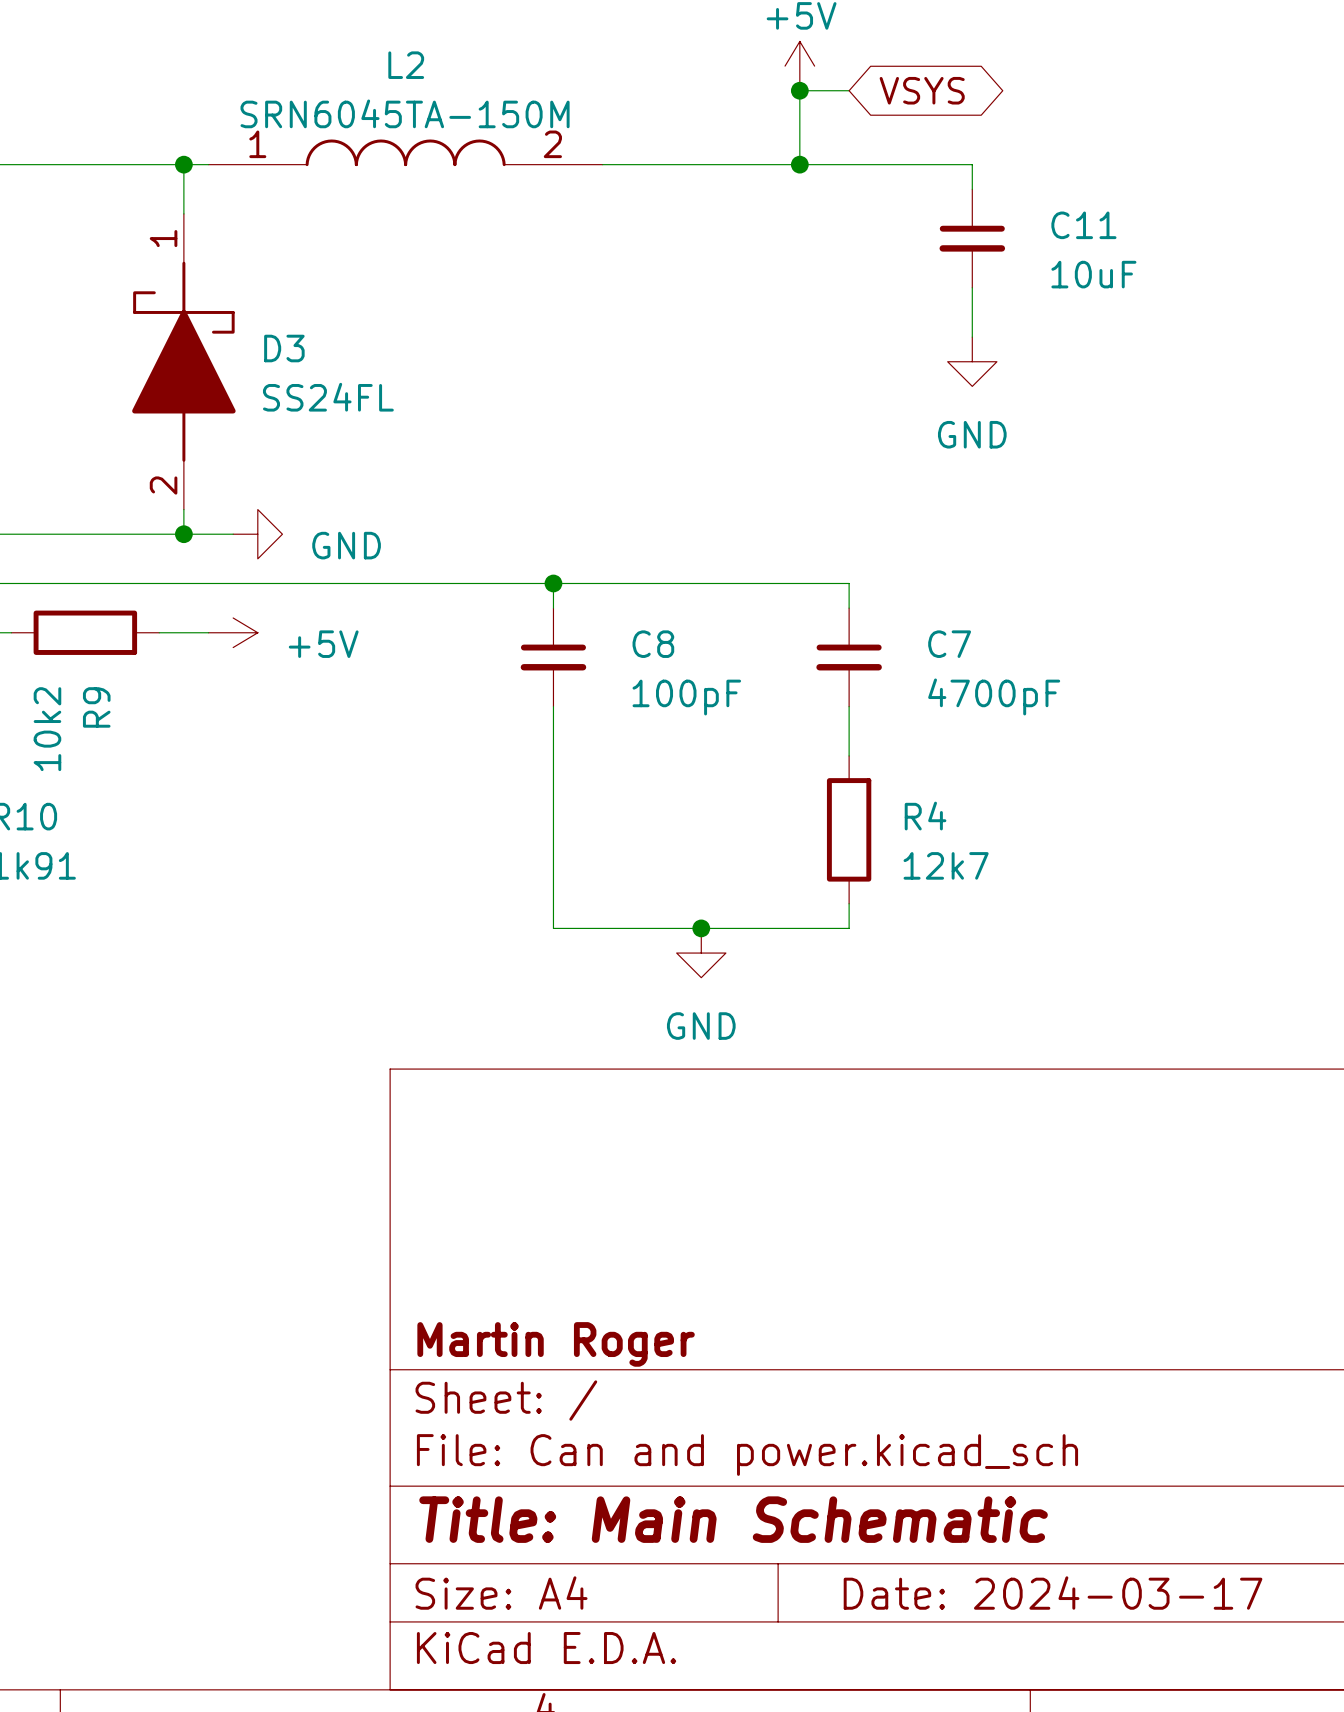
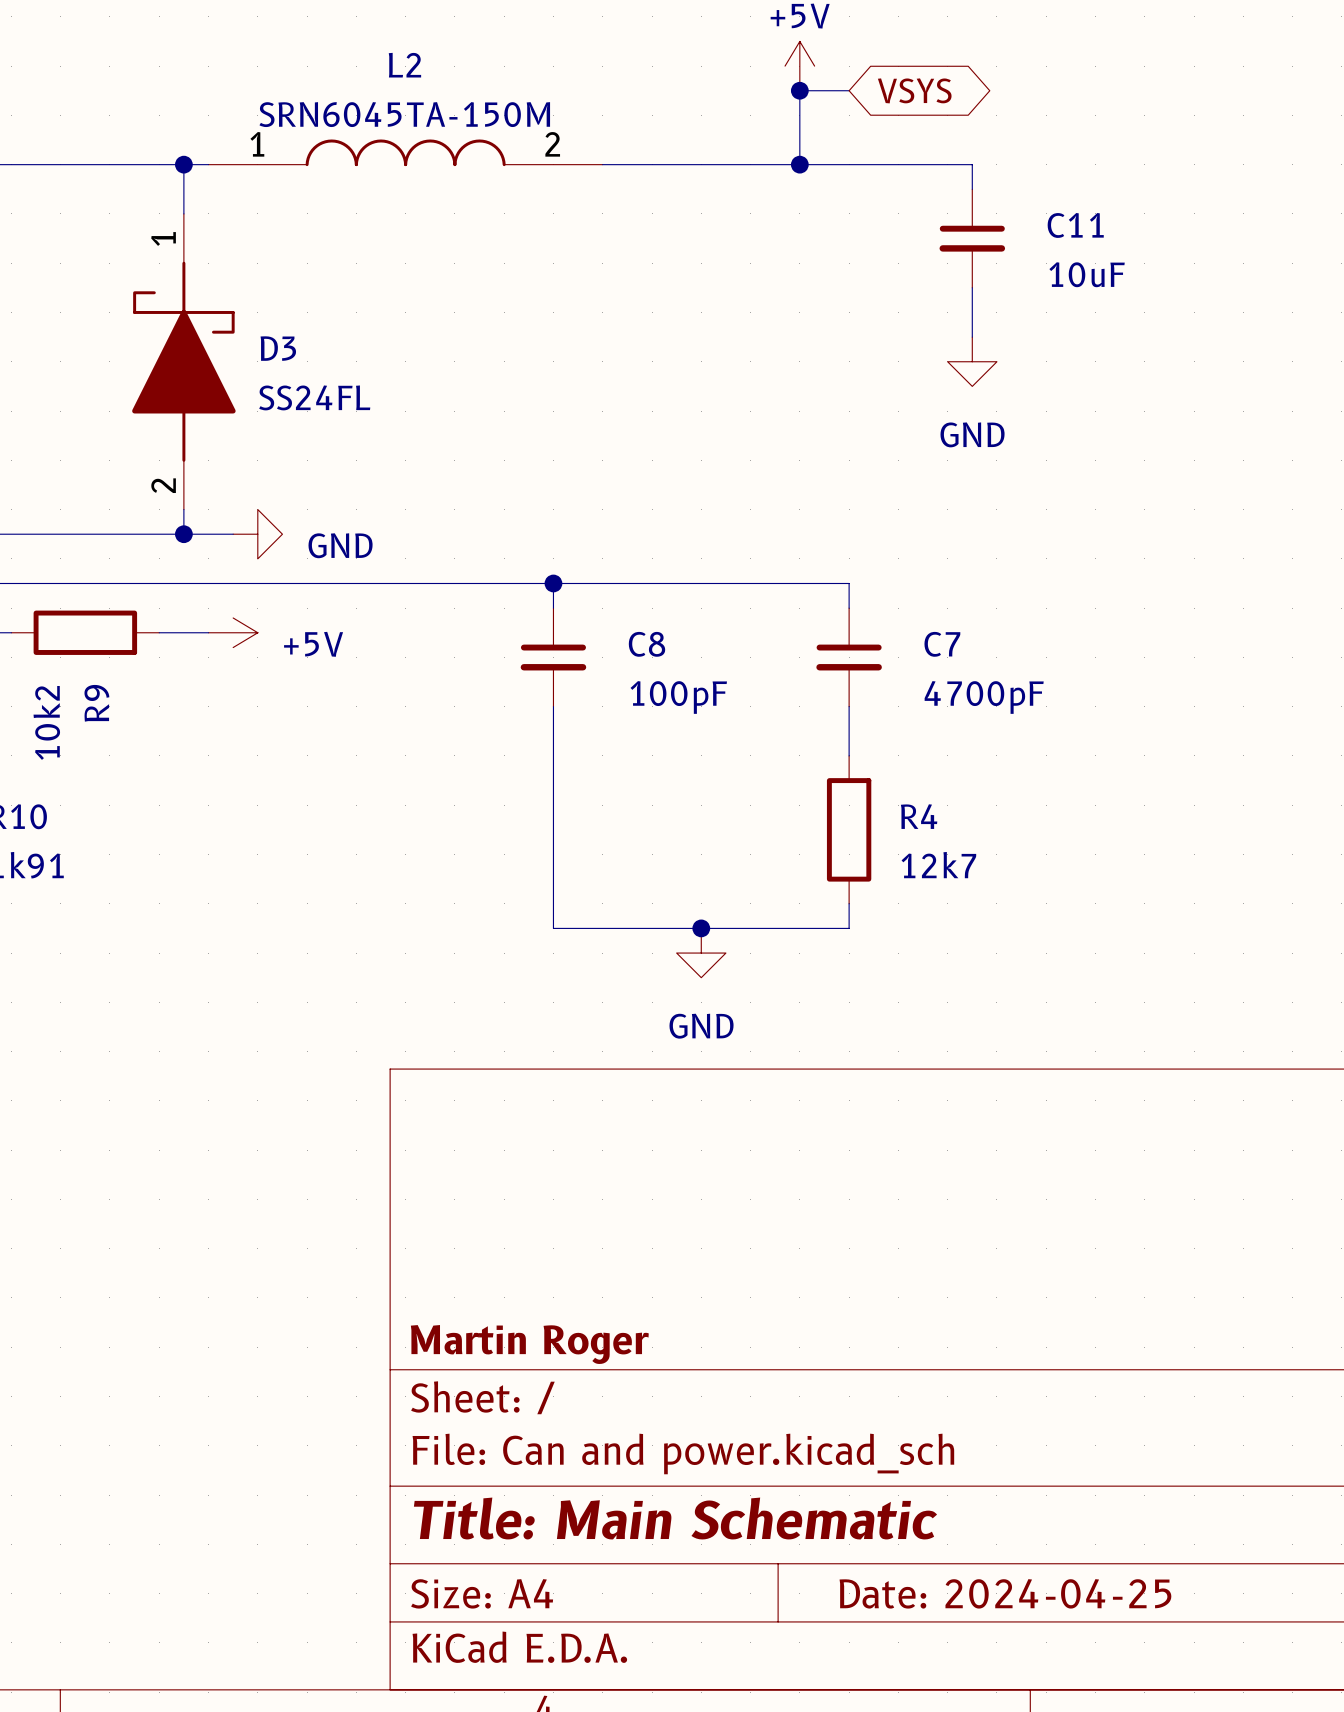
title block: Date: 2024-03-17 (1053, 1593) -> Date: 2024-04-25 (1005, 1593)

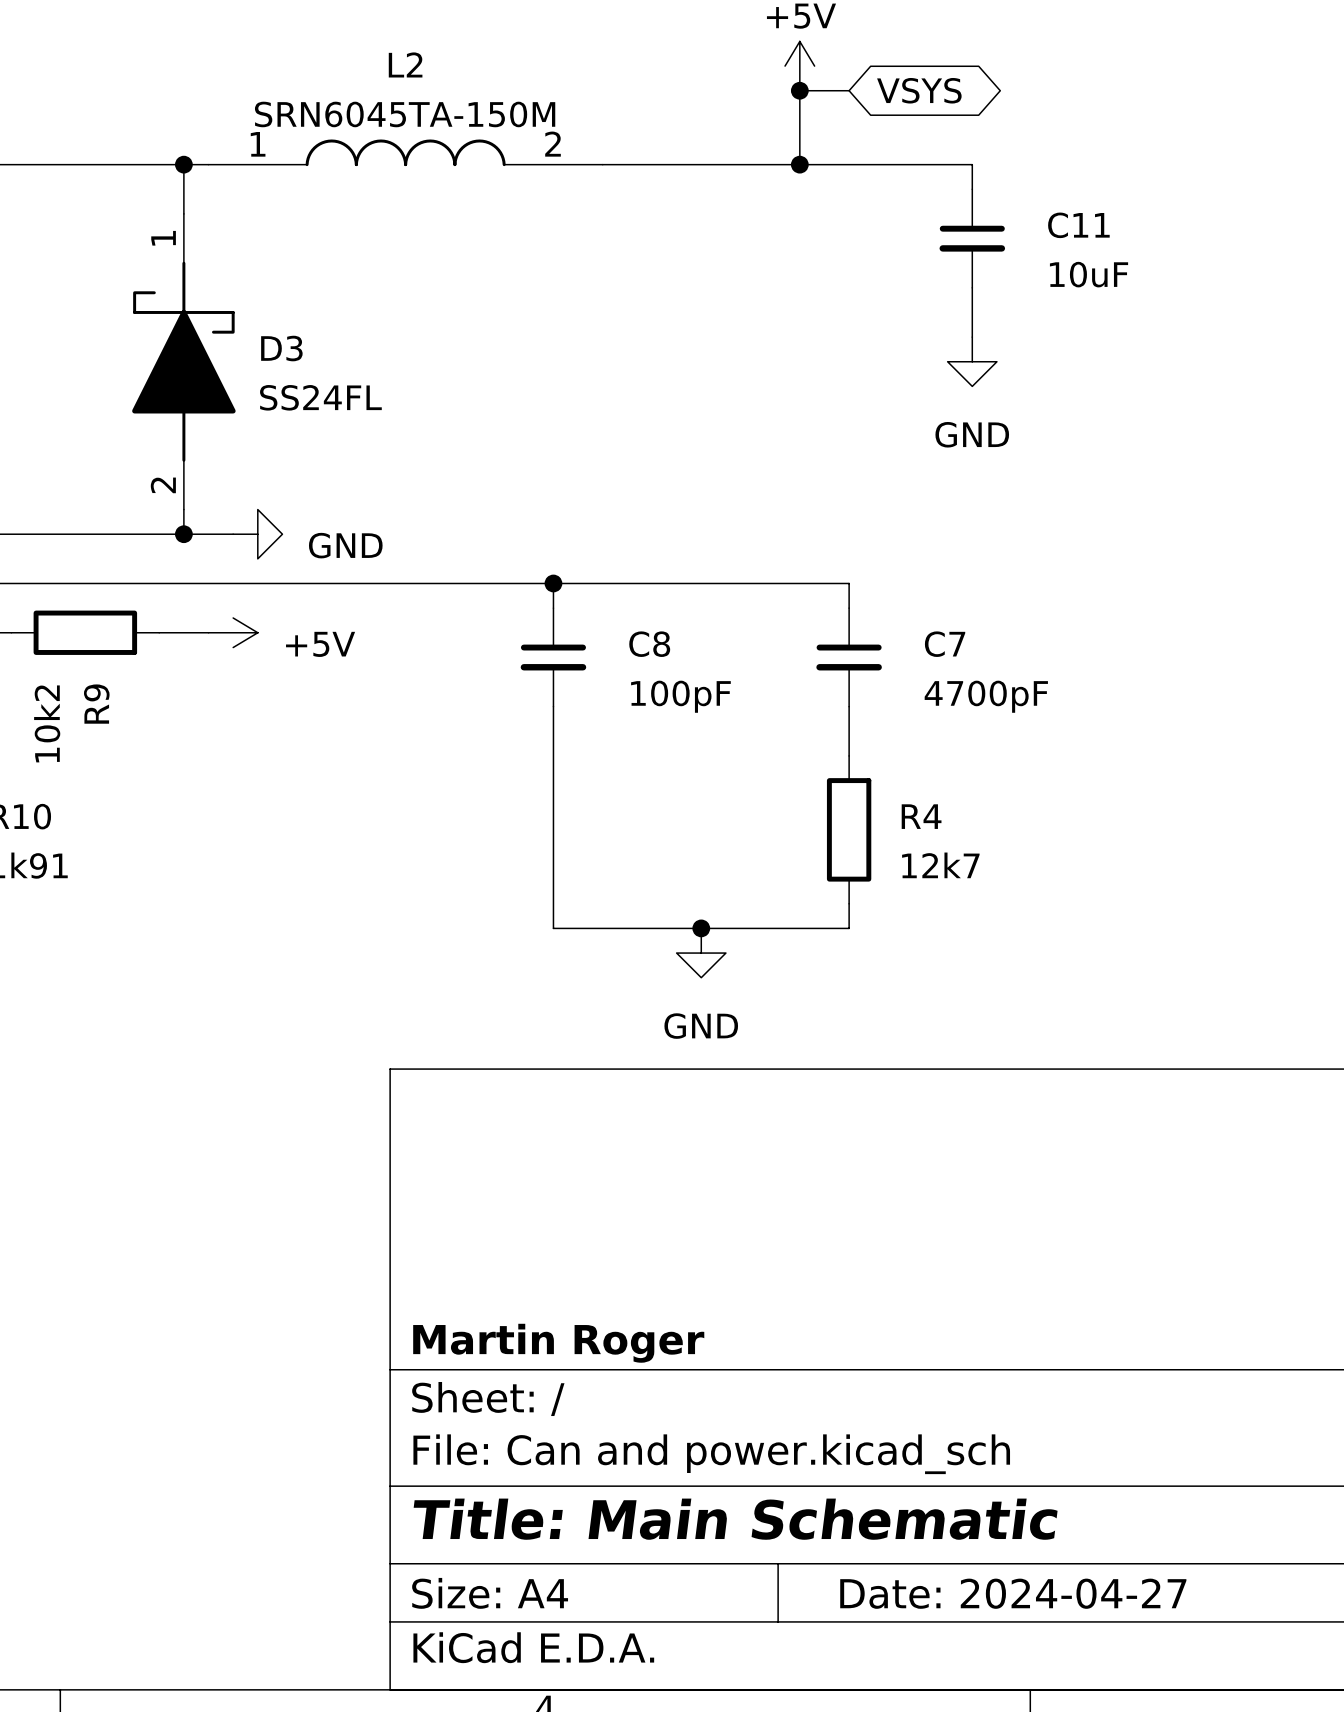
title block: Date: 2024-04-25 (1005, 1593) -> Date: 2024-04-27 (1013, 1593)

